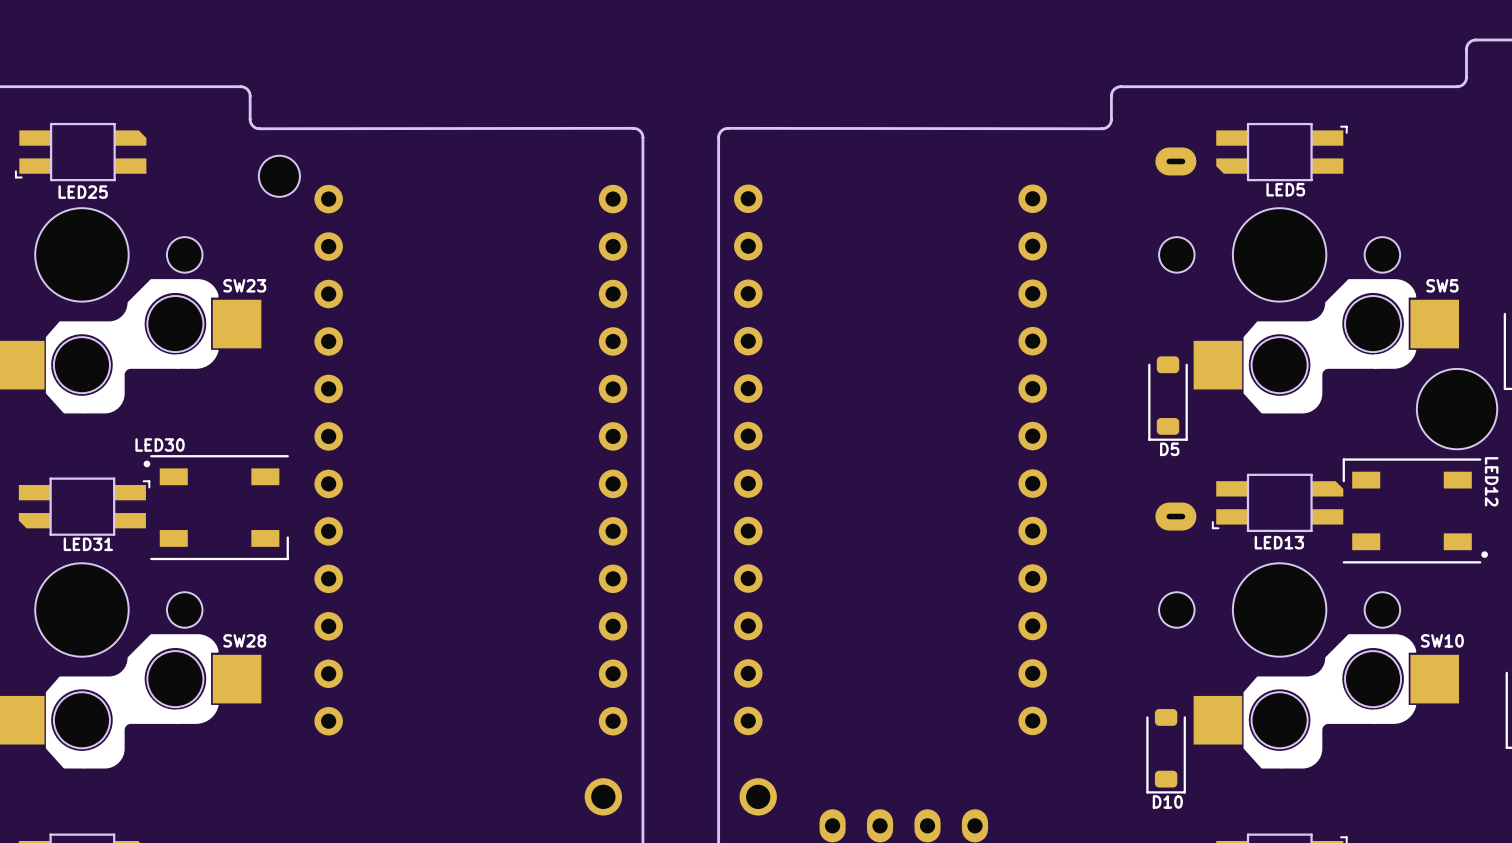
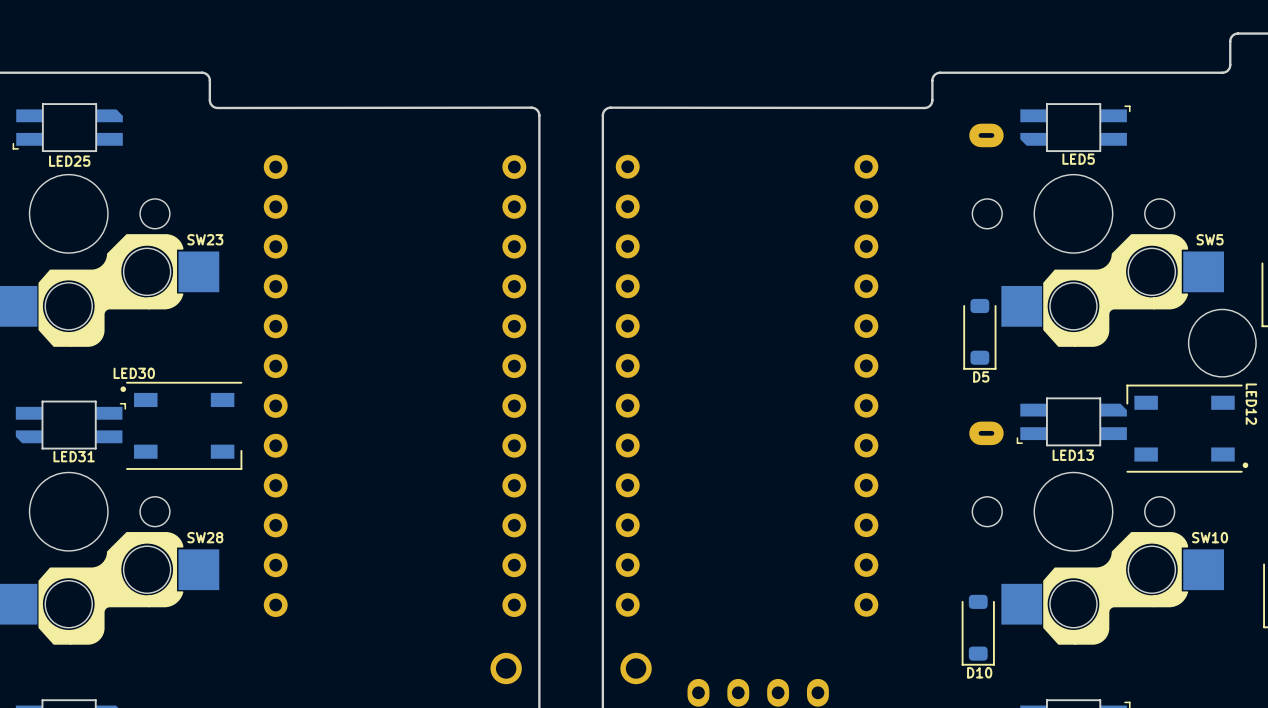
part: (279, 176) -> none

